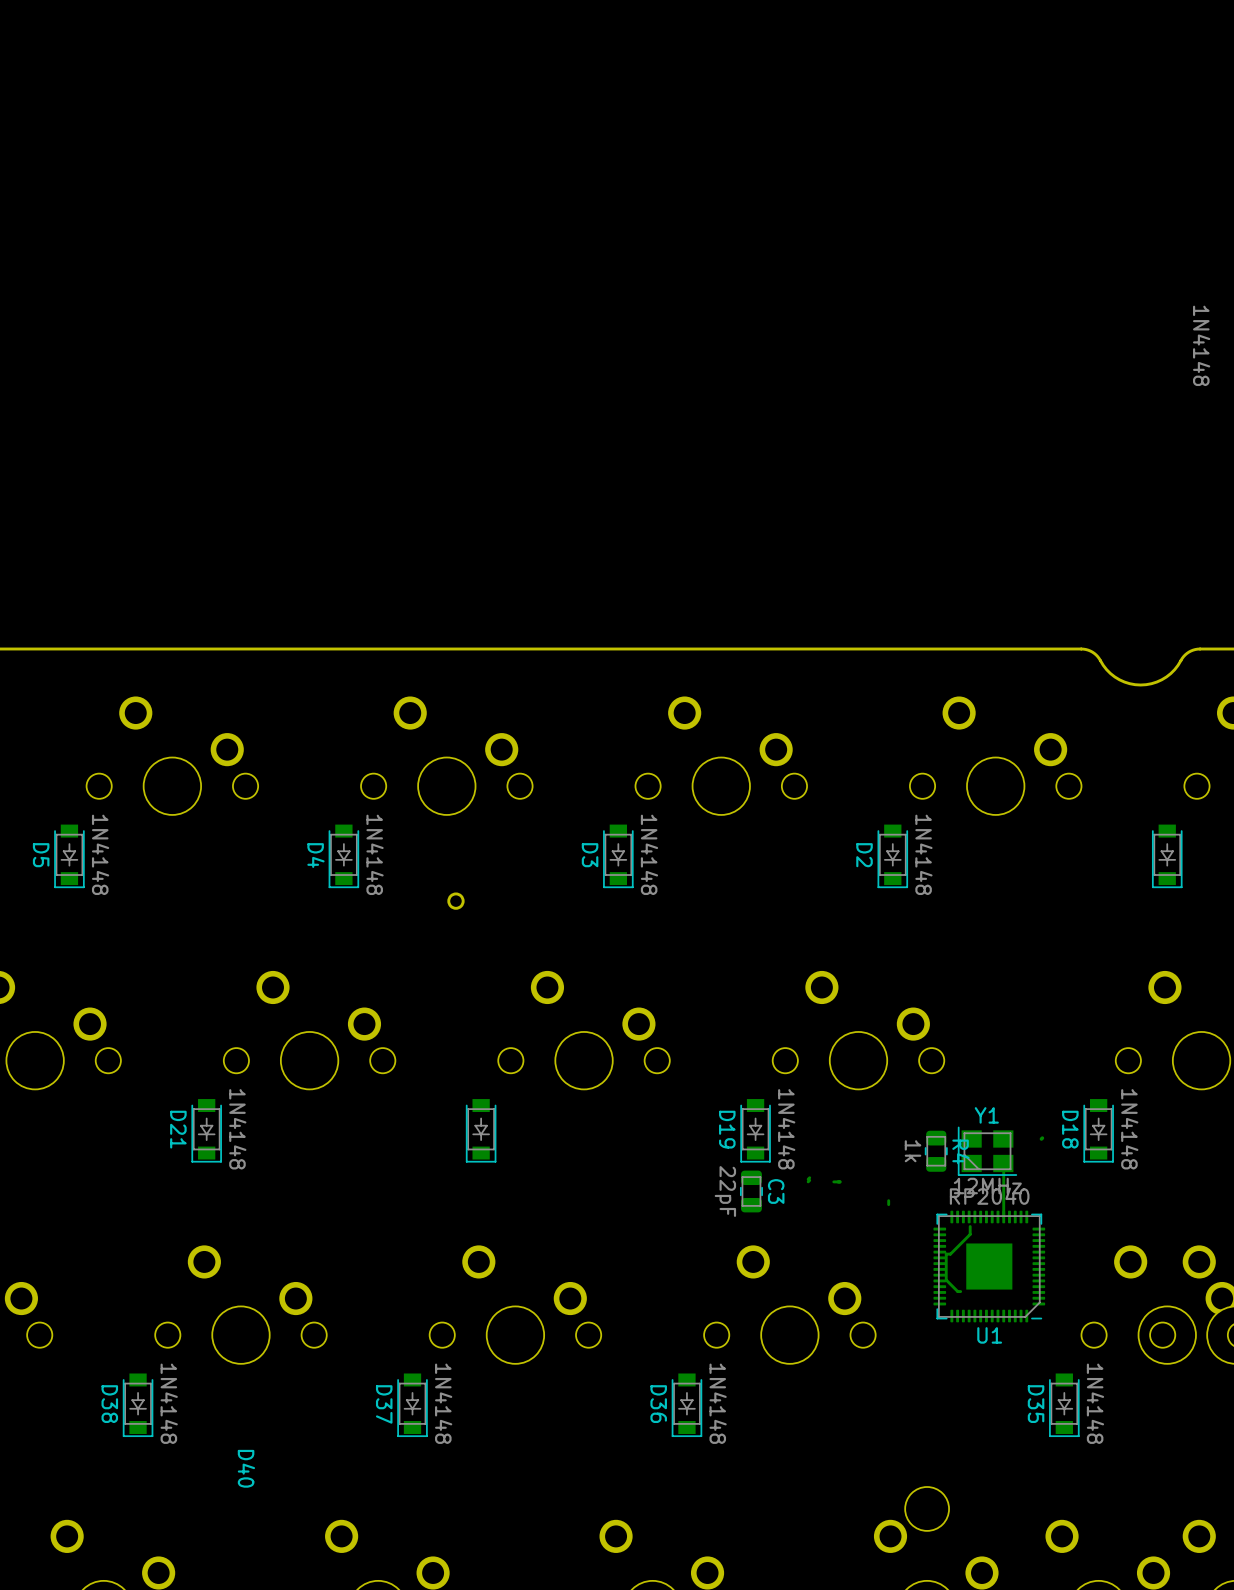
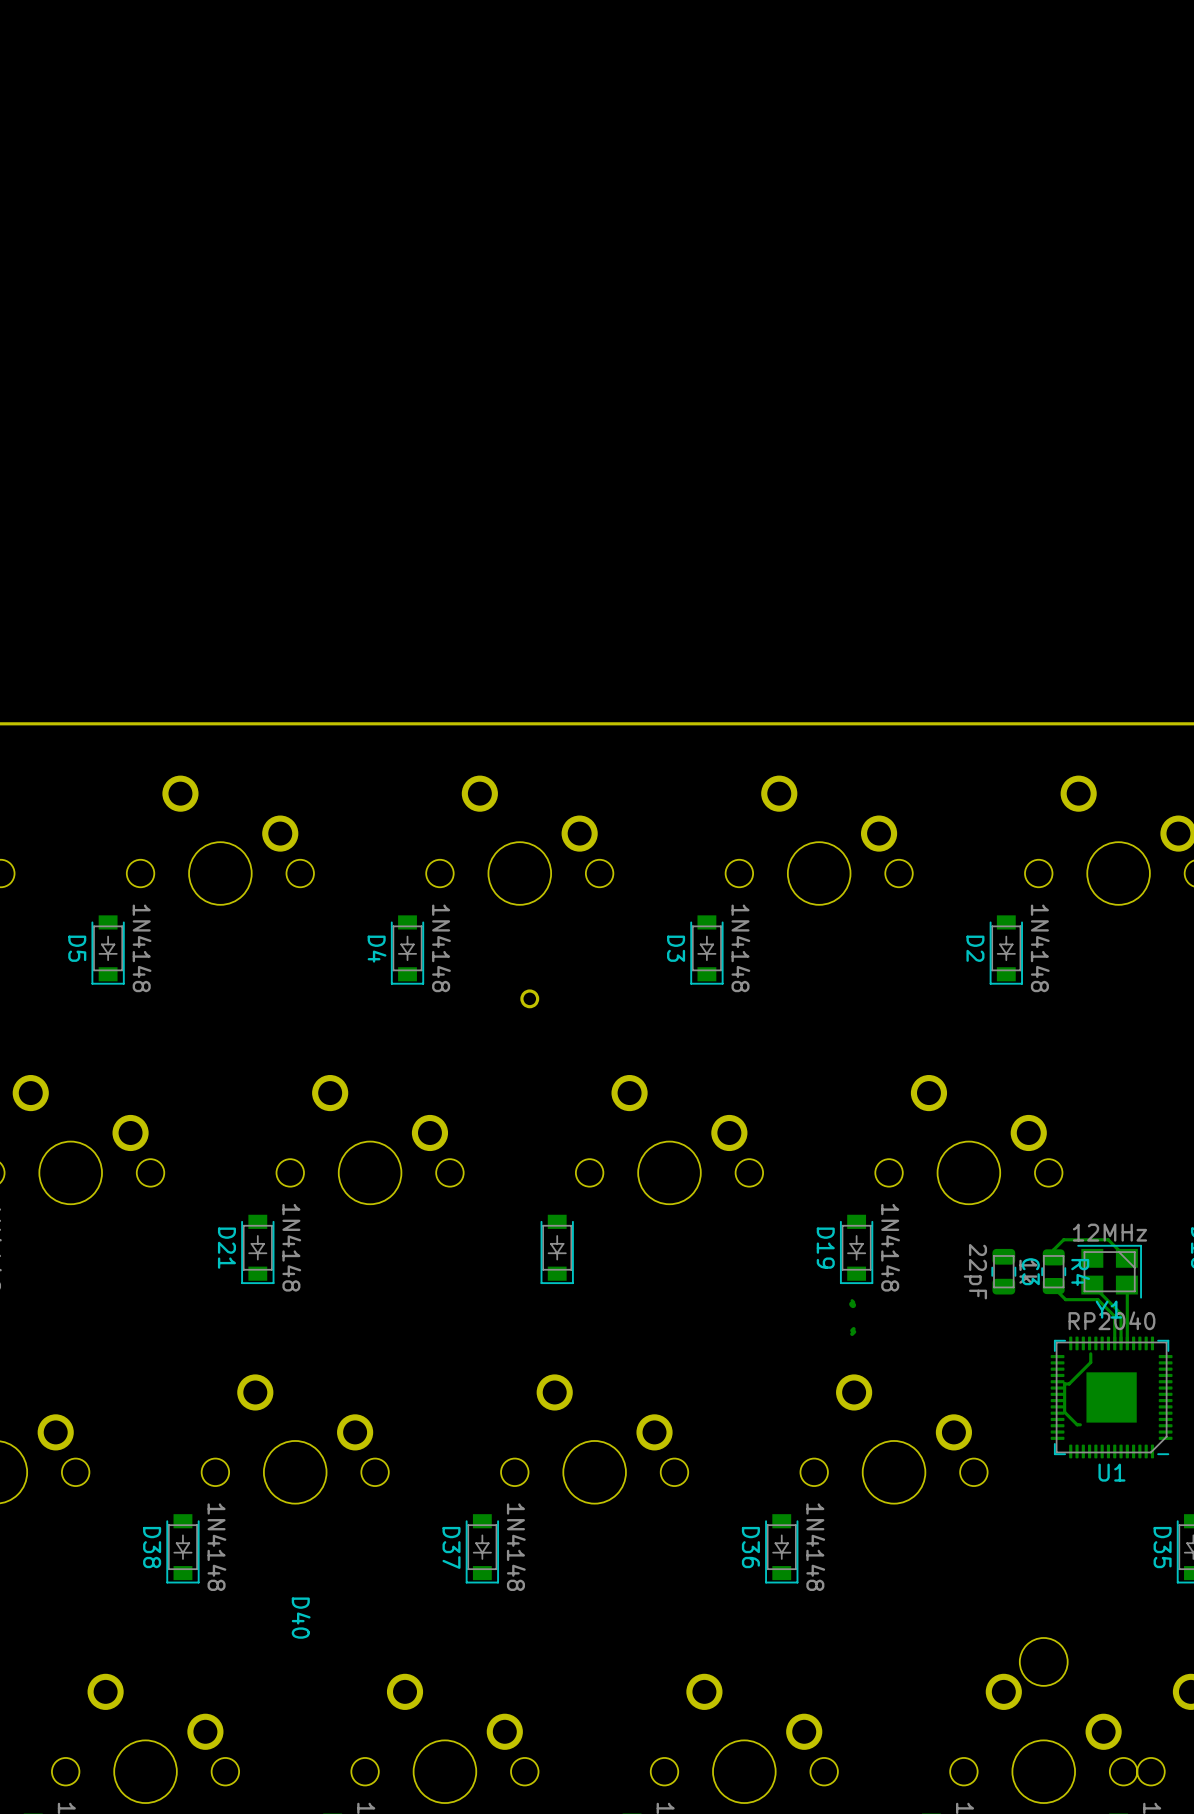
track: none -> (1053, 1257) (1053, 1249) (1063, 1239) (1108, 1239) (1126, 1258)
track: (1042, 1138) (1041, 1139) -> none
Y1 rotation: 0° (987, 1151) -> 180° (1109, 1271)
track: none -> (1092, 1285) (1121, 1313) (1121, 1343)
track: none -> (1053, 1286) (1065, 1299) (1098, 1299) (1114, 1316) (1114, 1343)
track: (809, 1177) (808, 1179) -> none
track: (809, 1180) (808, 1181) -> none
track: (838, 1181) (833, 1181) -> none
C3 position: (751, 1191) -> (1003, 1271)
track: (888, 1200) (888, 1204) -> none

